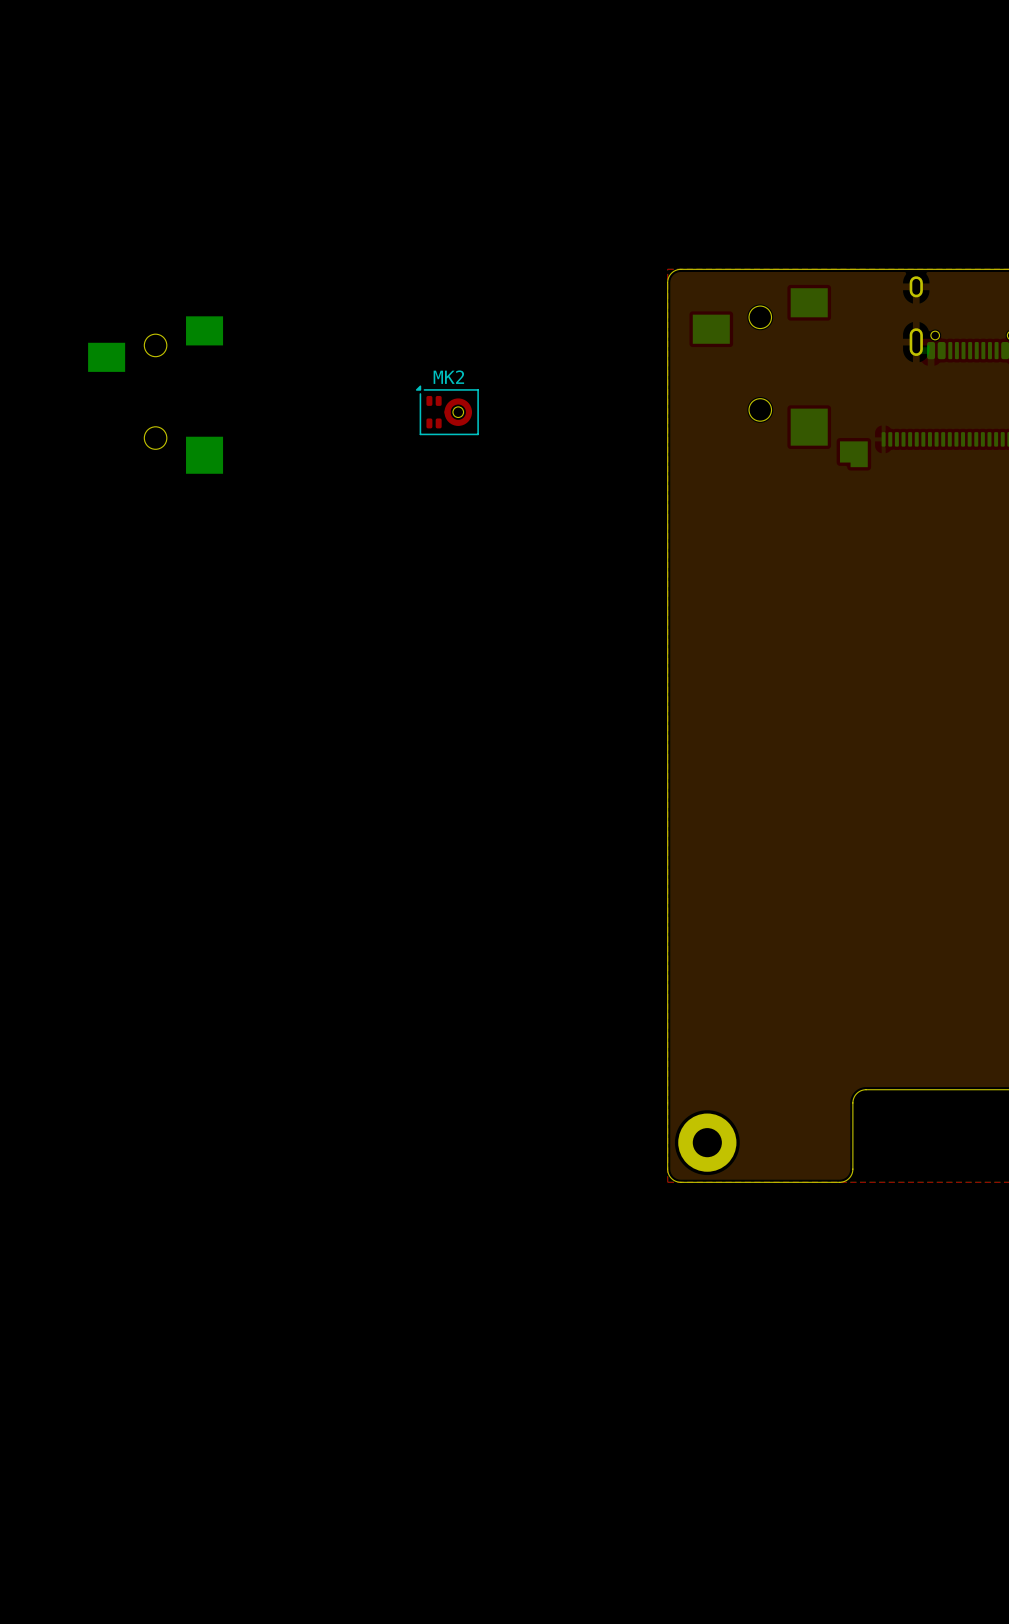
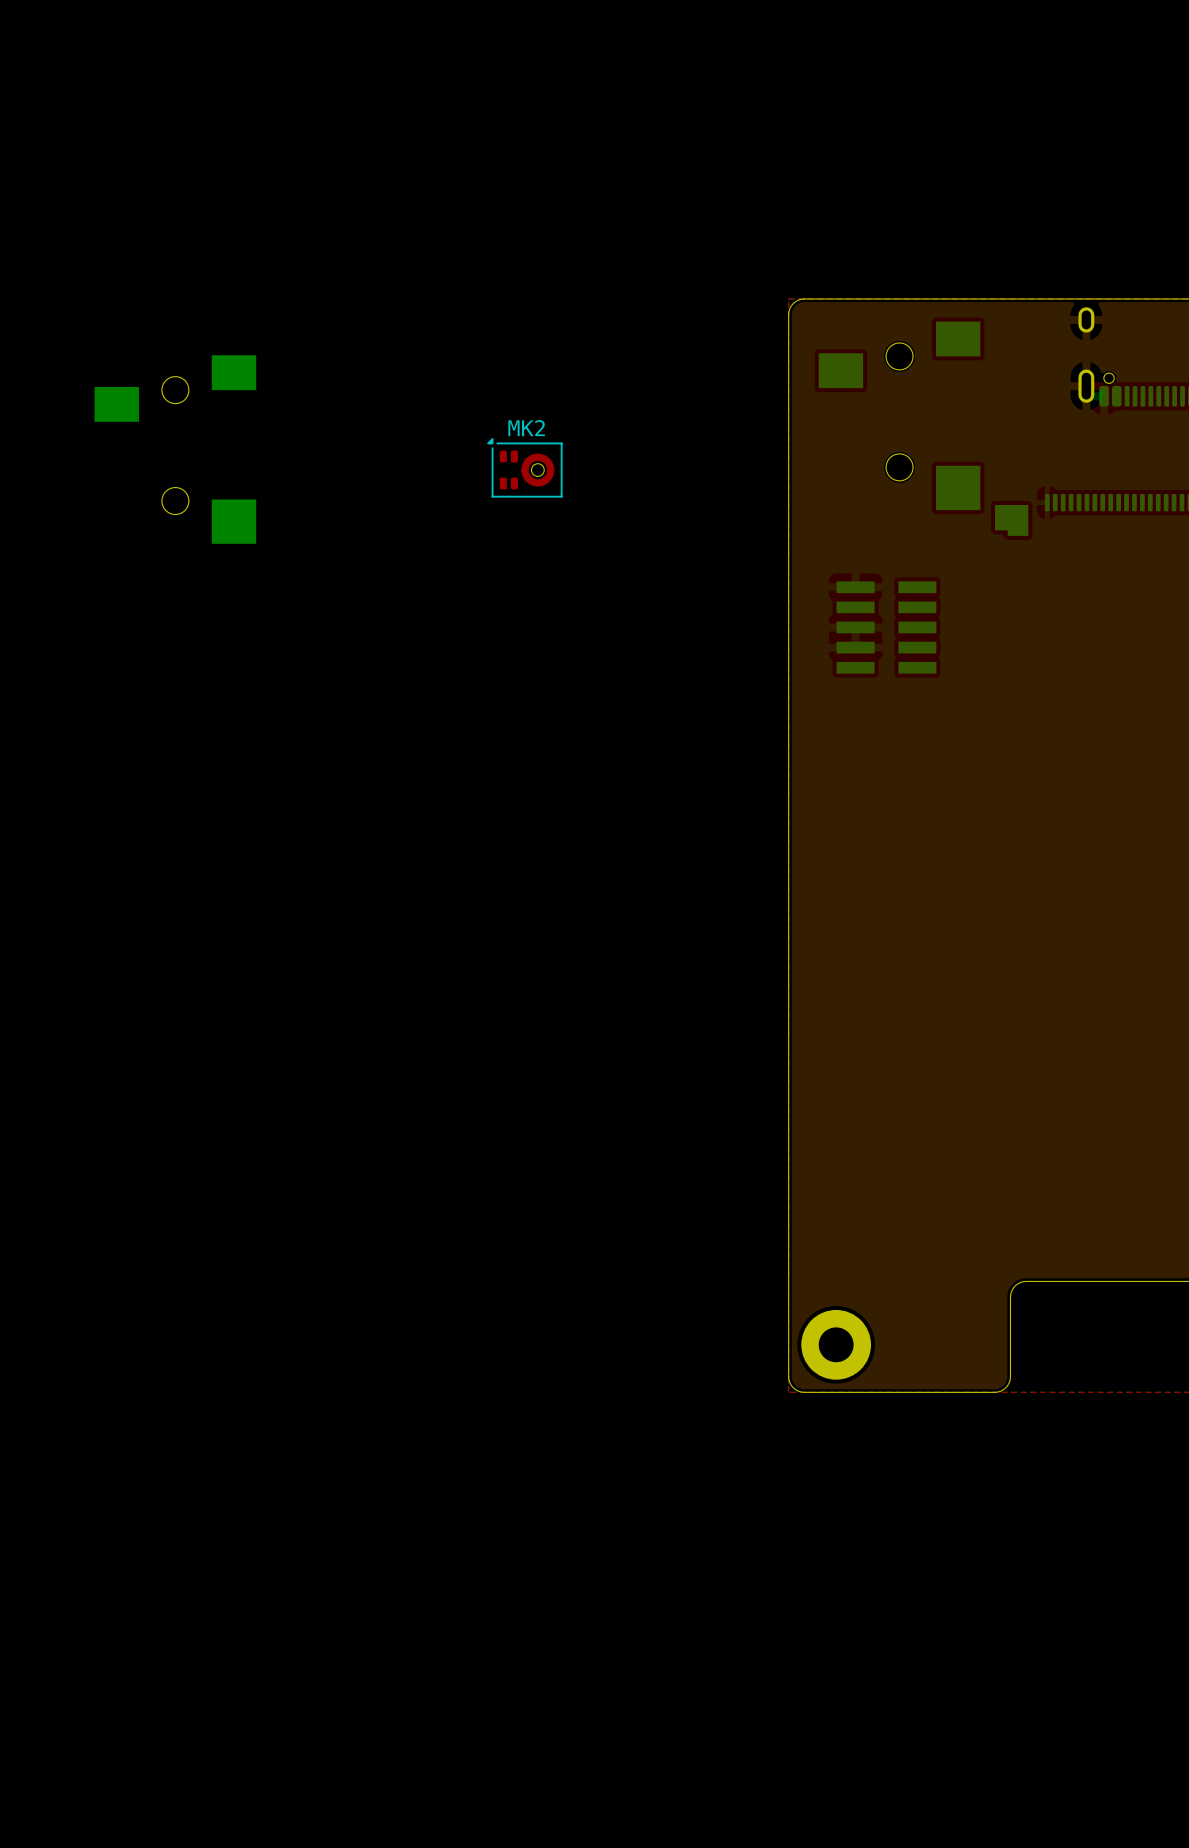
part: none -> (886, 627)

